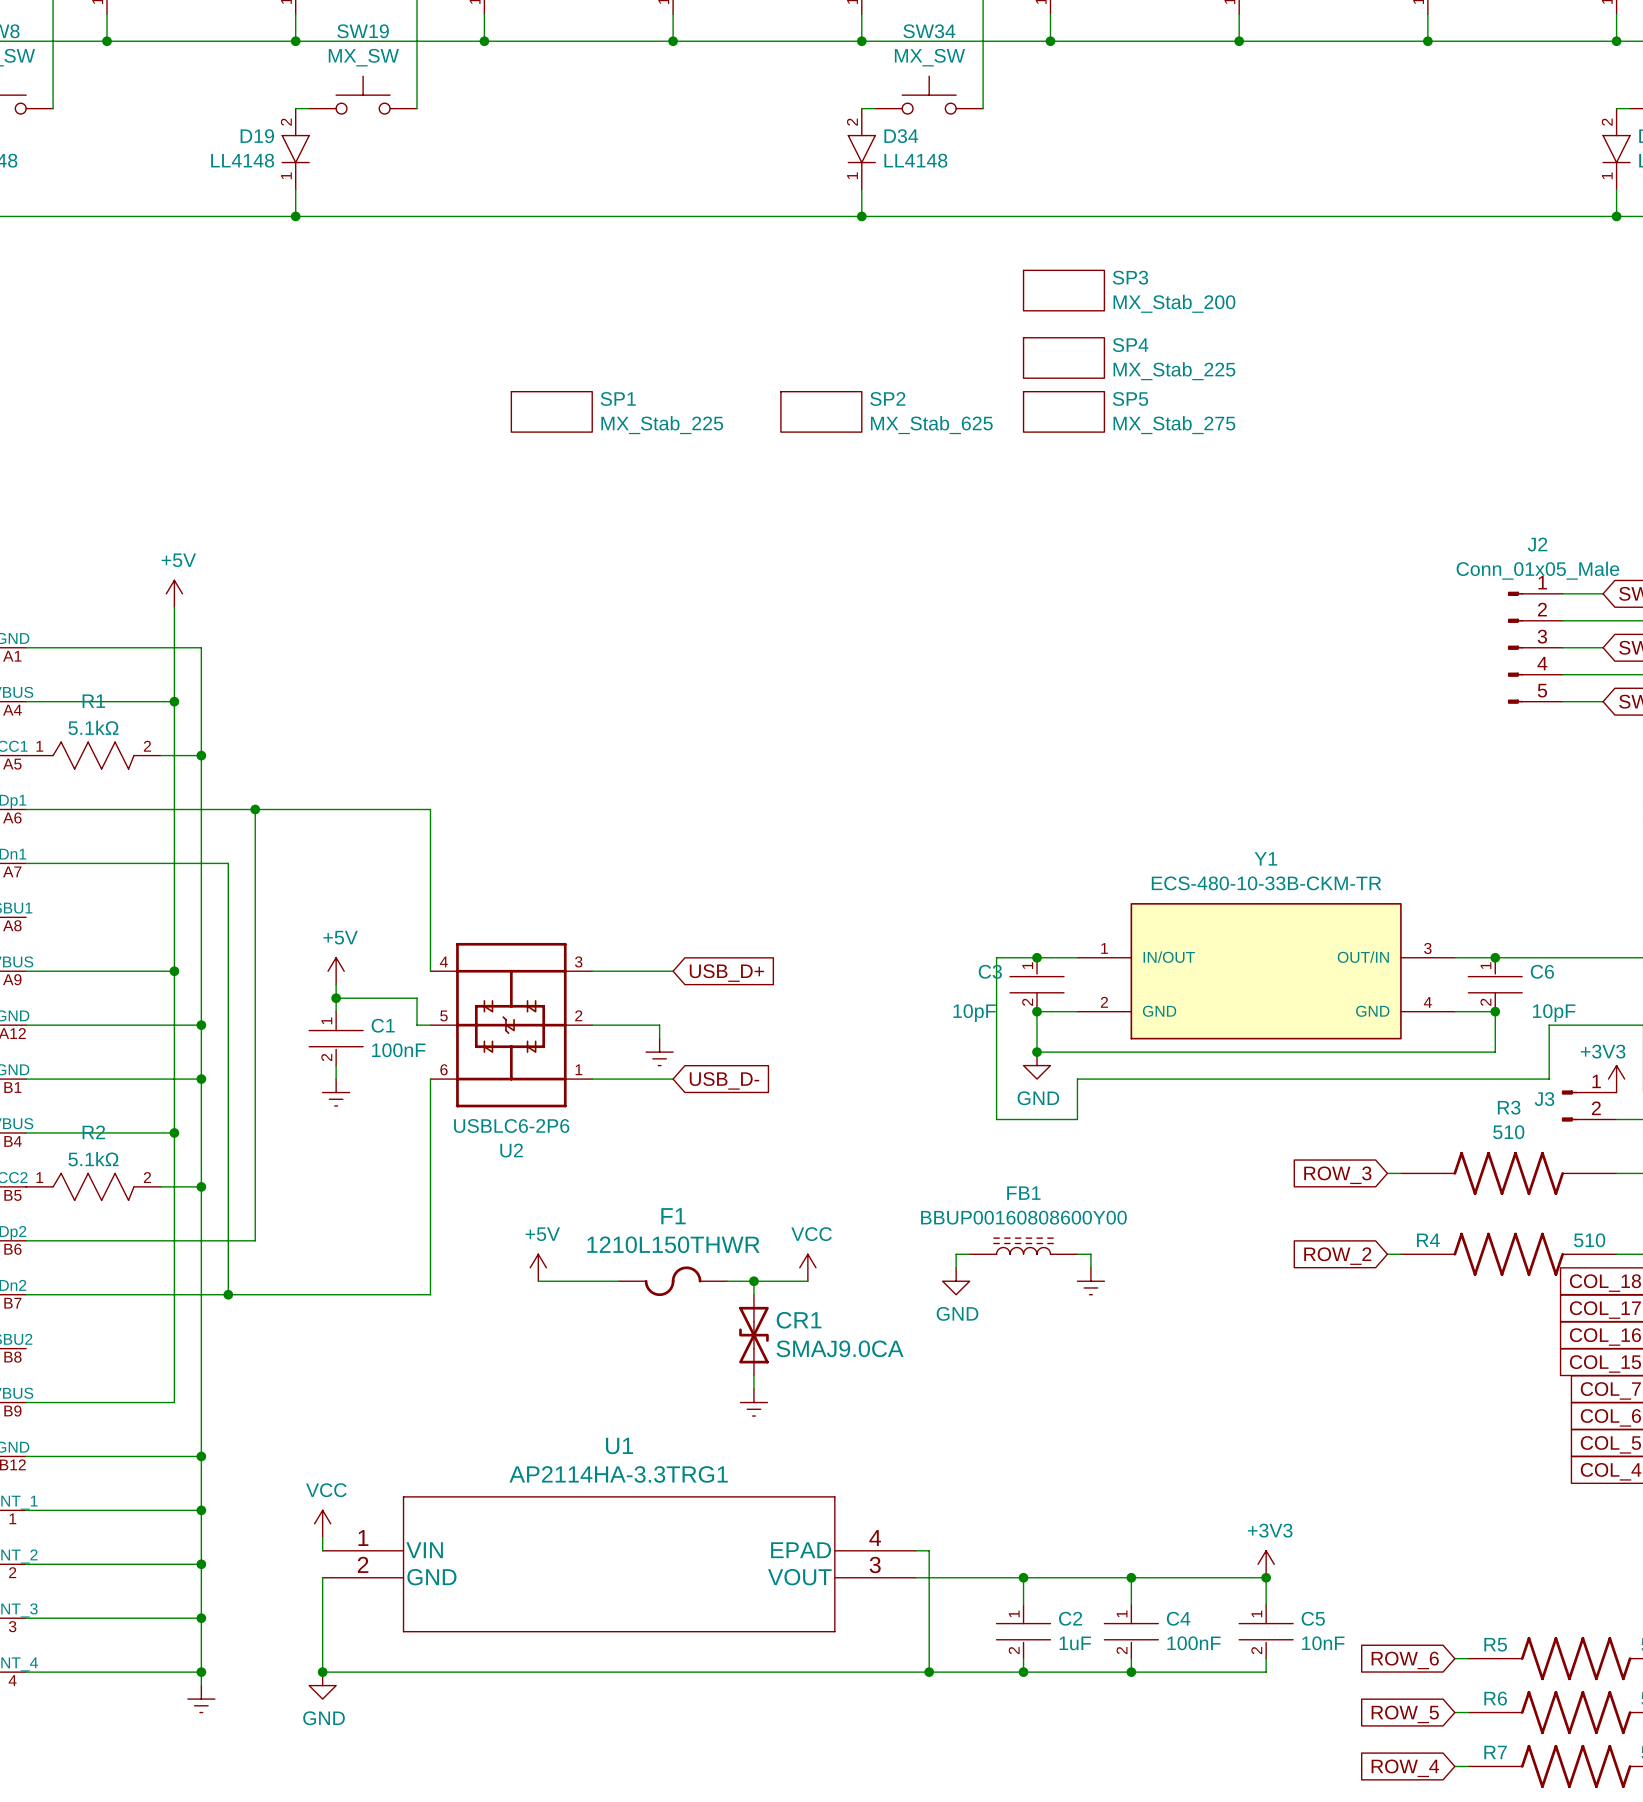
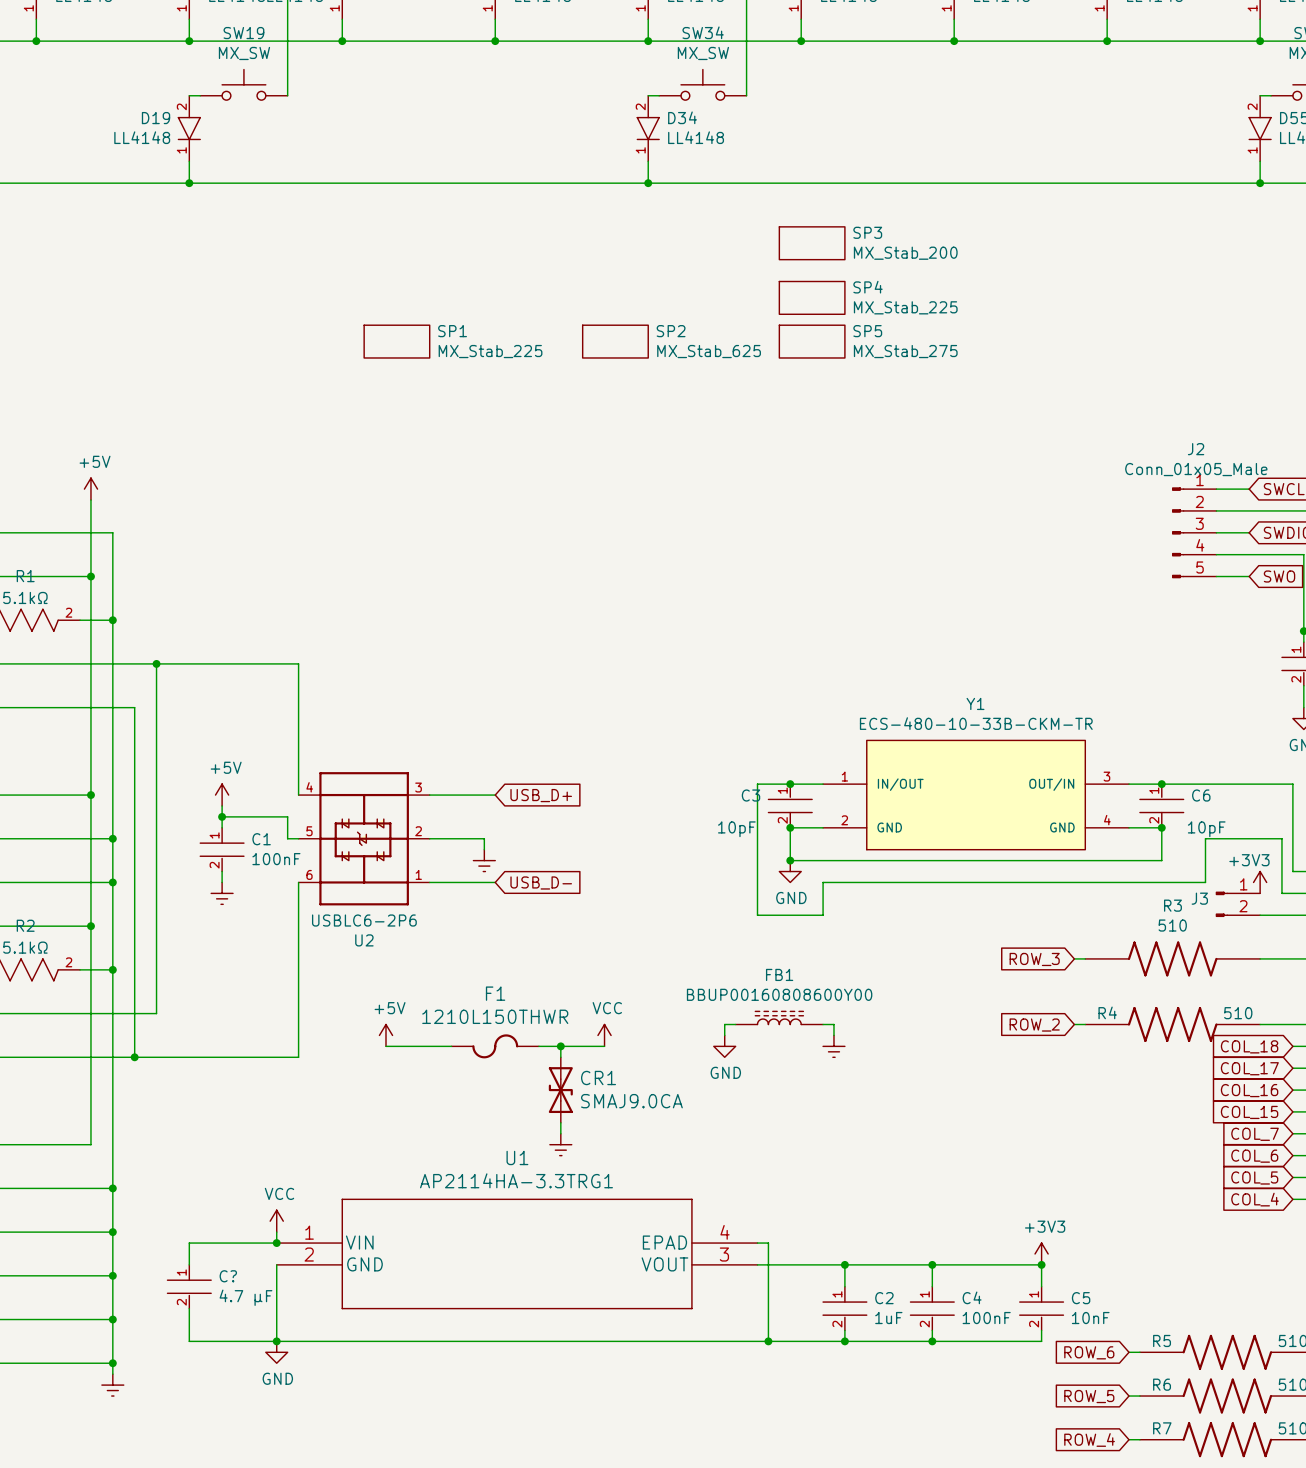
wire: none -> (276, 1232) (276, 1243) (189, 1243) (189, 1264)
power symbol position: VCC (322, 1523) -> VCC (276, 1221)
junction: none -> (276, 1243)
wire: (322, 1537) (322, 1550) -> none
wire: (915, 1550) (929, 1550) (929, 1672) -> (757, 1243) (768, 1243) (768, 1341)
junction: none -> (844, 1264)
junction: none -> (932, 1264)
junction: none -> (1041, 1264)
U1 position: (619, 1564) -> (517, 1253)
power symbol position: +3V3 (1266, 1564) -> +3V3 (1041, 1253)
C?: none -> (189, 1286)
wire: (322, 1577) (322, 1672) (1266, 1672) (1266, 1658) -> none
wire: (915, 1577) (1266, 1577) (1266, 1604) -> (757, 1264) (1041, 1264) (1041, 1286)
wire: (1023, 1577) (1023, 1604) -> (844, 1264) (844, 1286)
junction: (1023, 1577) -> none
wire: (1131, 1577) (1131, 1604) -> (932, 1264) (932, 1286)
junction: (1131, 1577) -> none
junction: (1266, 1577) -> none
wire: none -> (189, 1308) (189, 1341) (1041, 1341) (1041, 1330)
C2 position: (1023, 1631) -> (844, 1308)
C4 position: (1131, 1631) -> (932, 1308)
C5 position: (1266, 1631) -> (1041, 1308)
junction: none -> (276, 1341)
junction: none -> (844, 1341)
junction: none -> (932, 1341)
wire: (1023, 1658) (1023, 1672) -> (844, 1330) (844, 1341)
wire: (1131, 1658) (1131, 1672) -> (932, 1330) (932, 1341)
junction: (322, 1672) -> none
junction: (929, 1672) -> none
junction position: (1023, 1672) -> (768, 1341)
junction: (1131, 1672) -> none
power symbol position: GND (322, 1685) -> GND (276, 1352)

